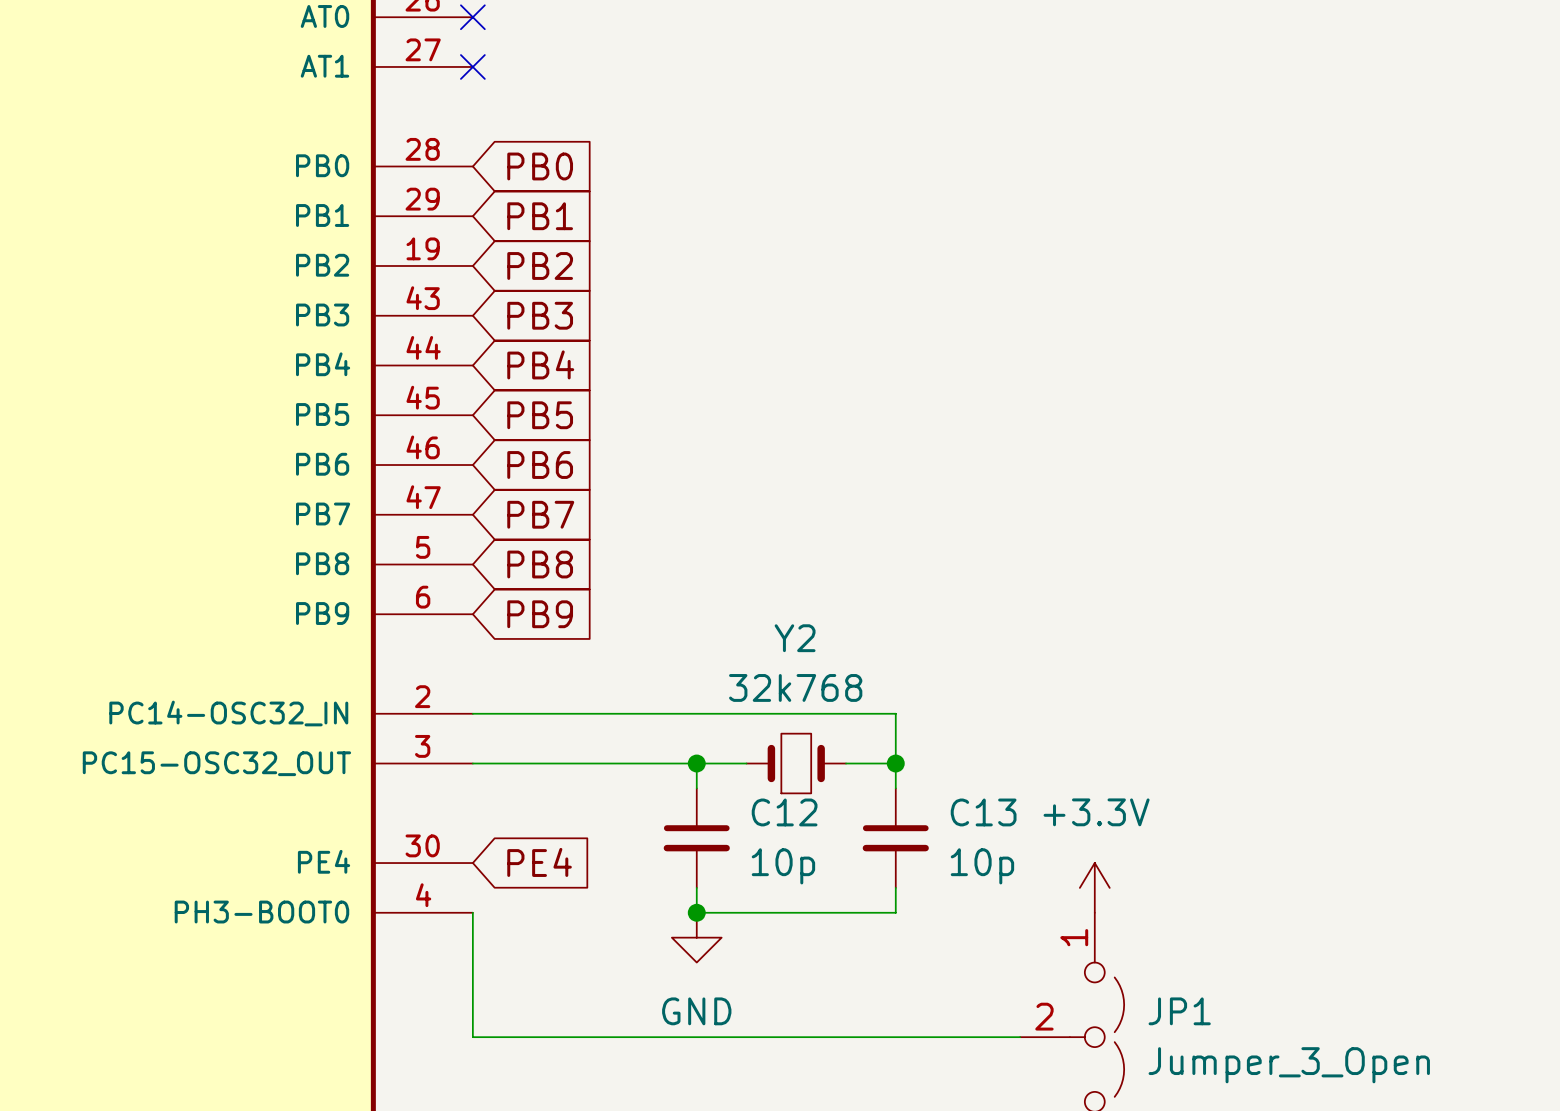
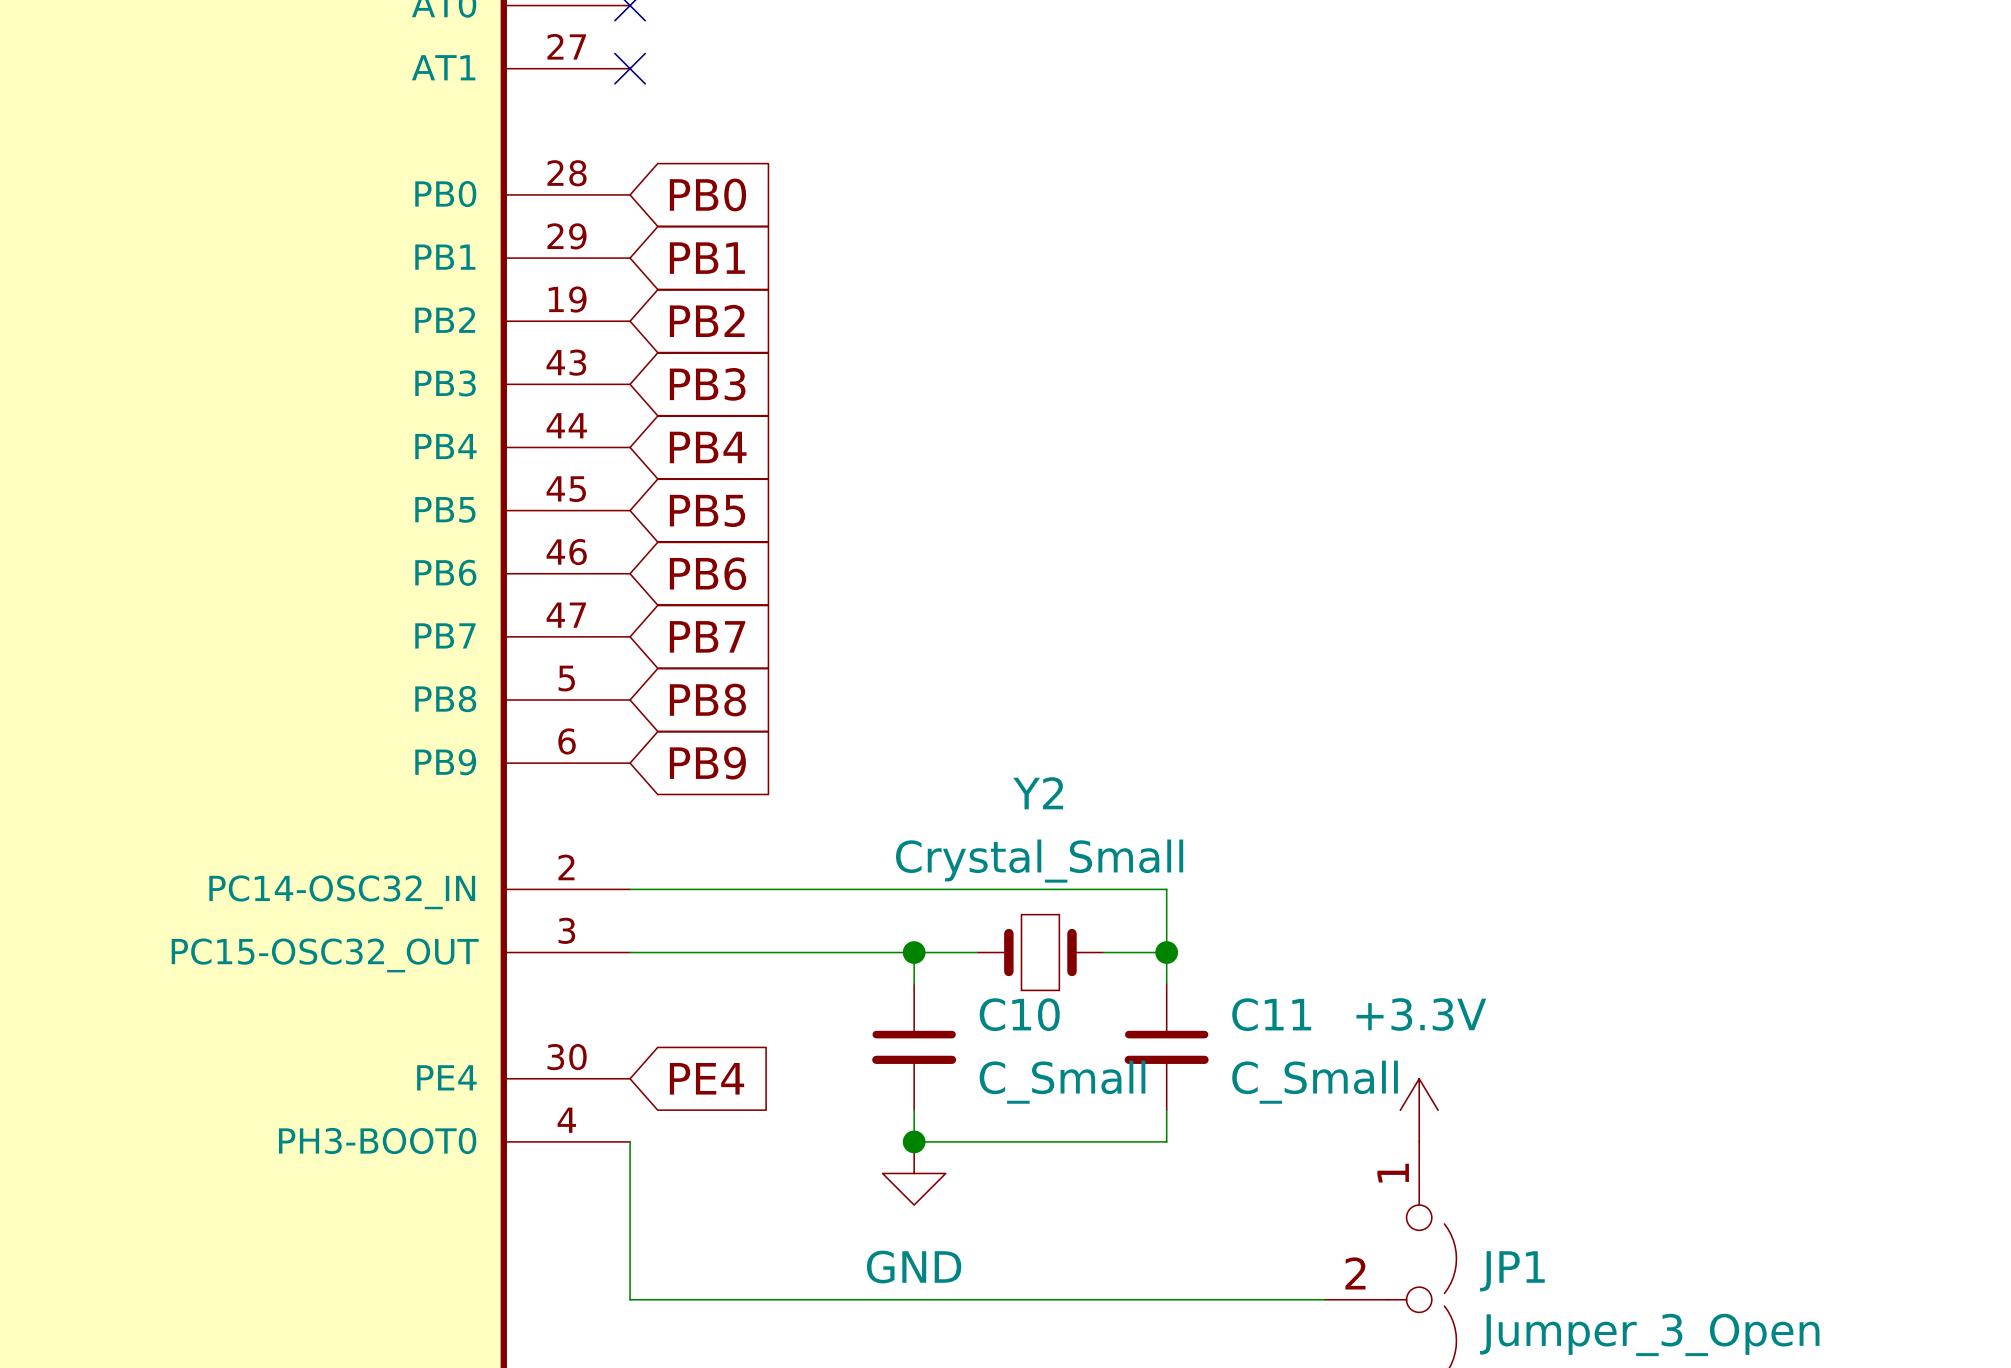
Y2 value: 32k768 (795, 687) -> Crystal_Small (1039, 861)
C12 name: C12 (784, 812) -> C10 (1019, 1014)
C13 name: C13 (983, 812) -> C11 (1271, 1014)
C12 value: 10p (783, 866) -> C_Small (1062, 1082)
C13 value: 10p (982, 866) -> C_Small (1315, 1082)

